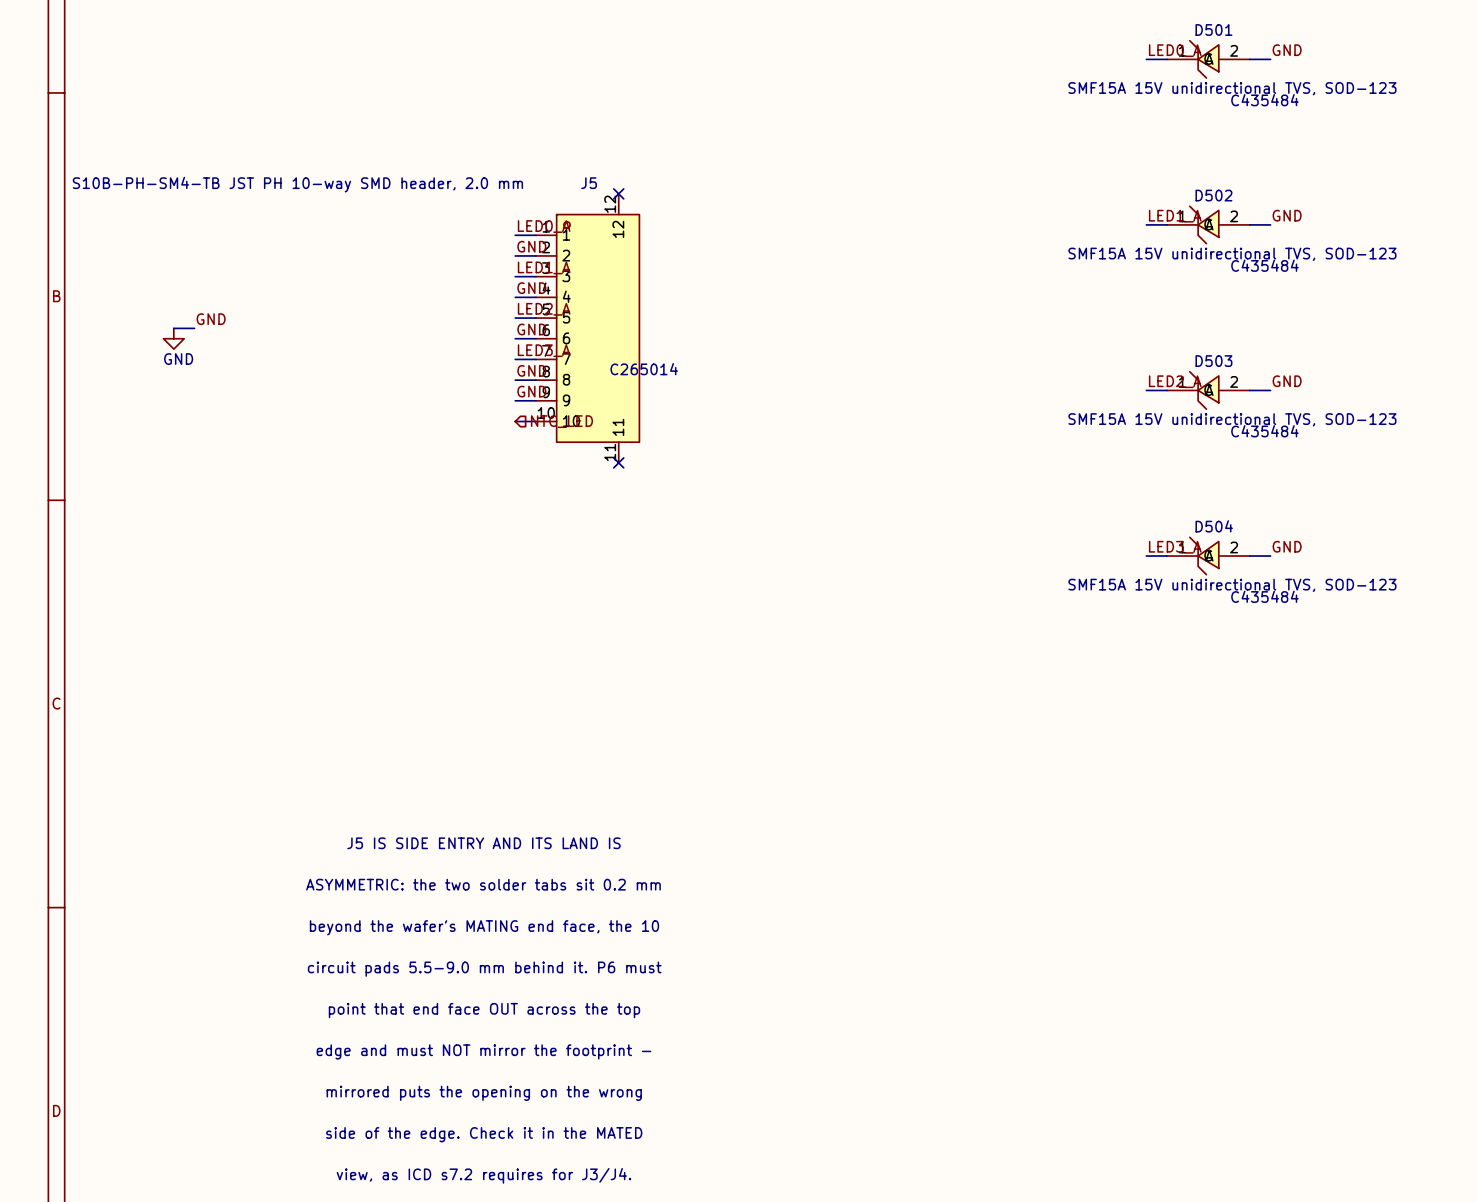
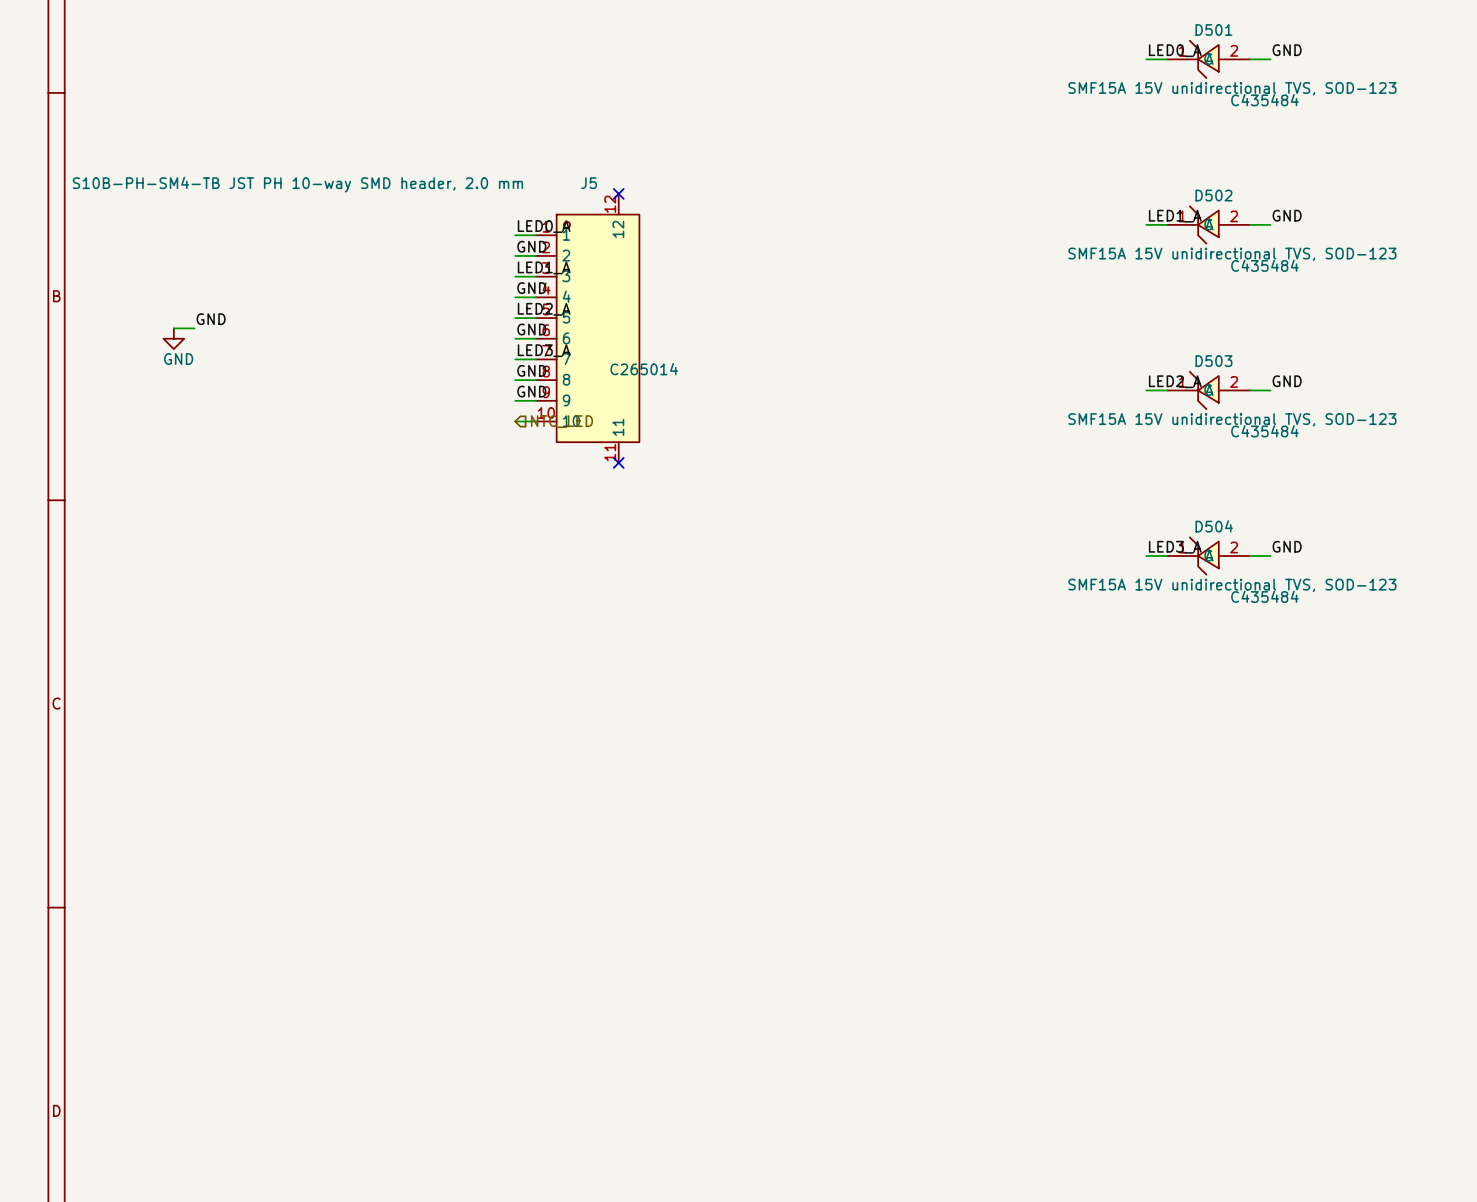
text: J5 IS SIDE ENTRY AND ITS LAND IS (483, 843) -> none
text: ASYMMETRIC: the two solder tabs sit 0.2 mm (483, 884) -> none
text: beyond the wafer's MATING end face, the 10 (484, 927) -> none
text: circuit pads 5.5-9.0 mm behind it. P6 must (484, 969) -> none
text: point that end face OUT across the top (484, 1010) -> none
text: edge and must NOT mirror the footprint - (483, 1051) -> none
text: mirrored puts the opening on the wrong (484, 1093) -> none
text: side of the edge. Check it in the MATED (484, 1134) -> none
text: view, as ICD s7.2 requires for J3/J4. (483, 1175) -> none

